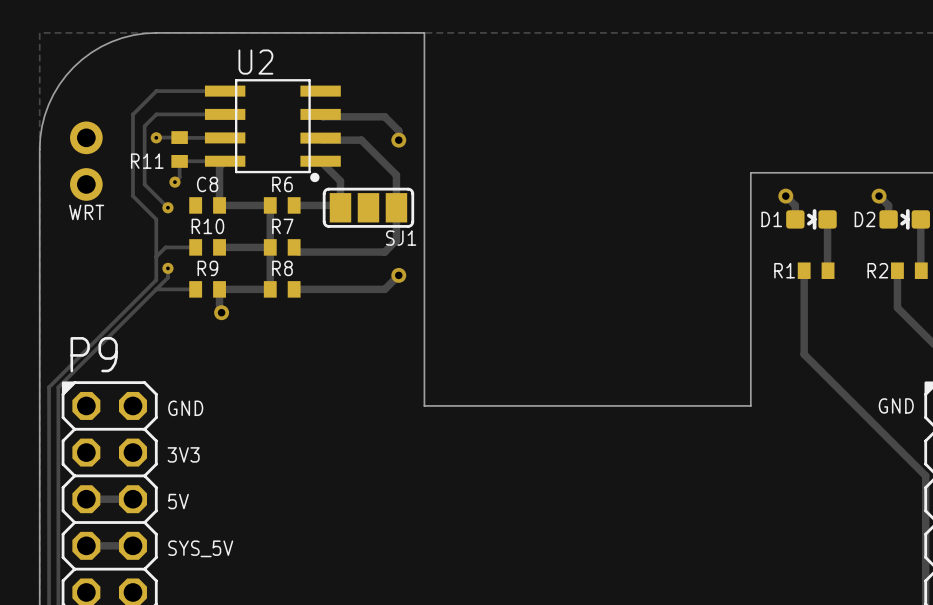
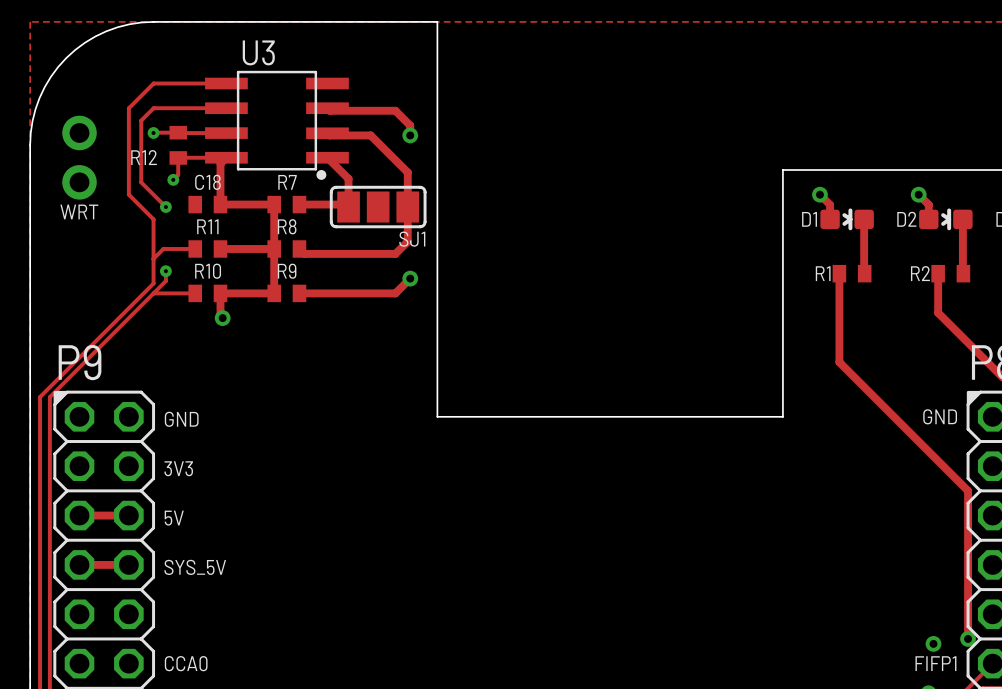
U2 name: U2 (255, 62) -> U3 (258, 52)
R11 name: R11 (147, 161) -> R12 (144, 157)
C8 name: C8 (207, 184) -> C18 (207, 182)
R6 name: R6 (282, 184) -> R7 (287, 182)
R10 name: R10 (207, 226) -> R11 (207, 226)
R7 name: R7 (282, 226) -> R8 (287, 226)
R9 name: R9 (207, 268) -> R10 (208, 271)
R8 name: R8 (282, 268) -> R9 (287, 271)

